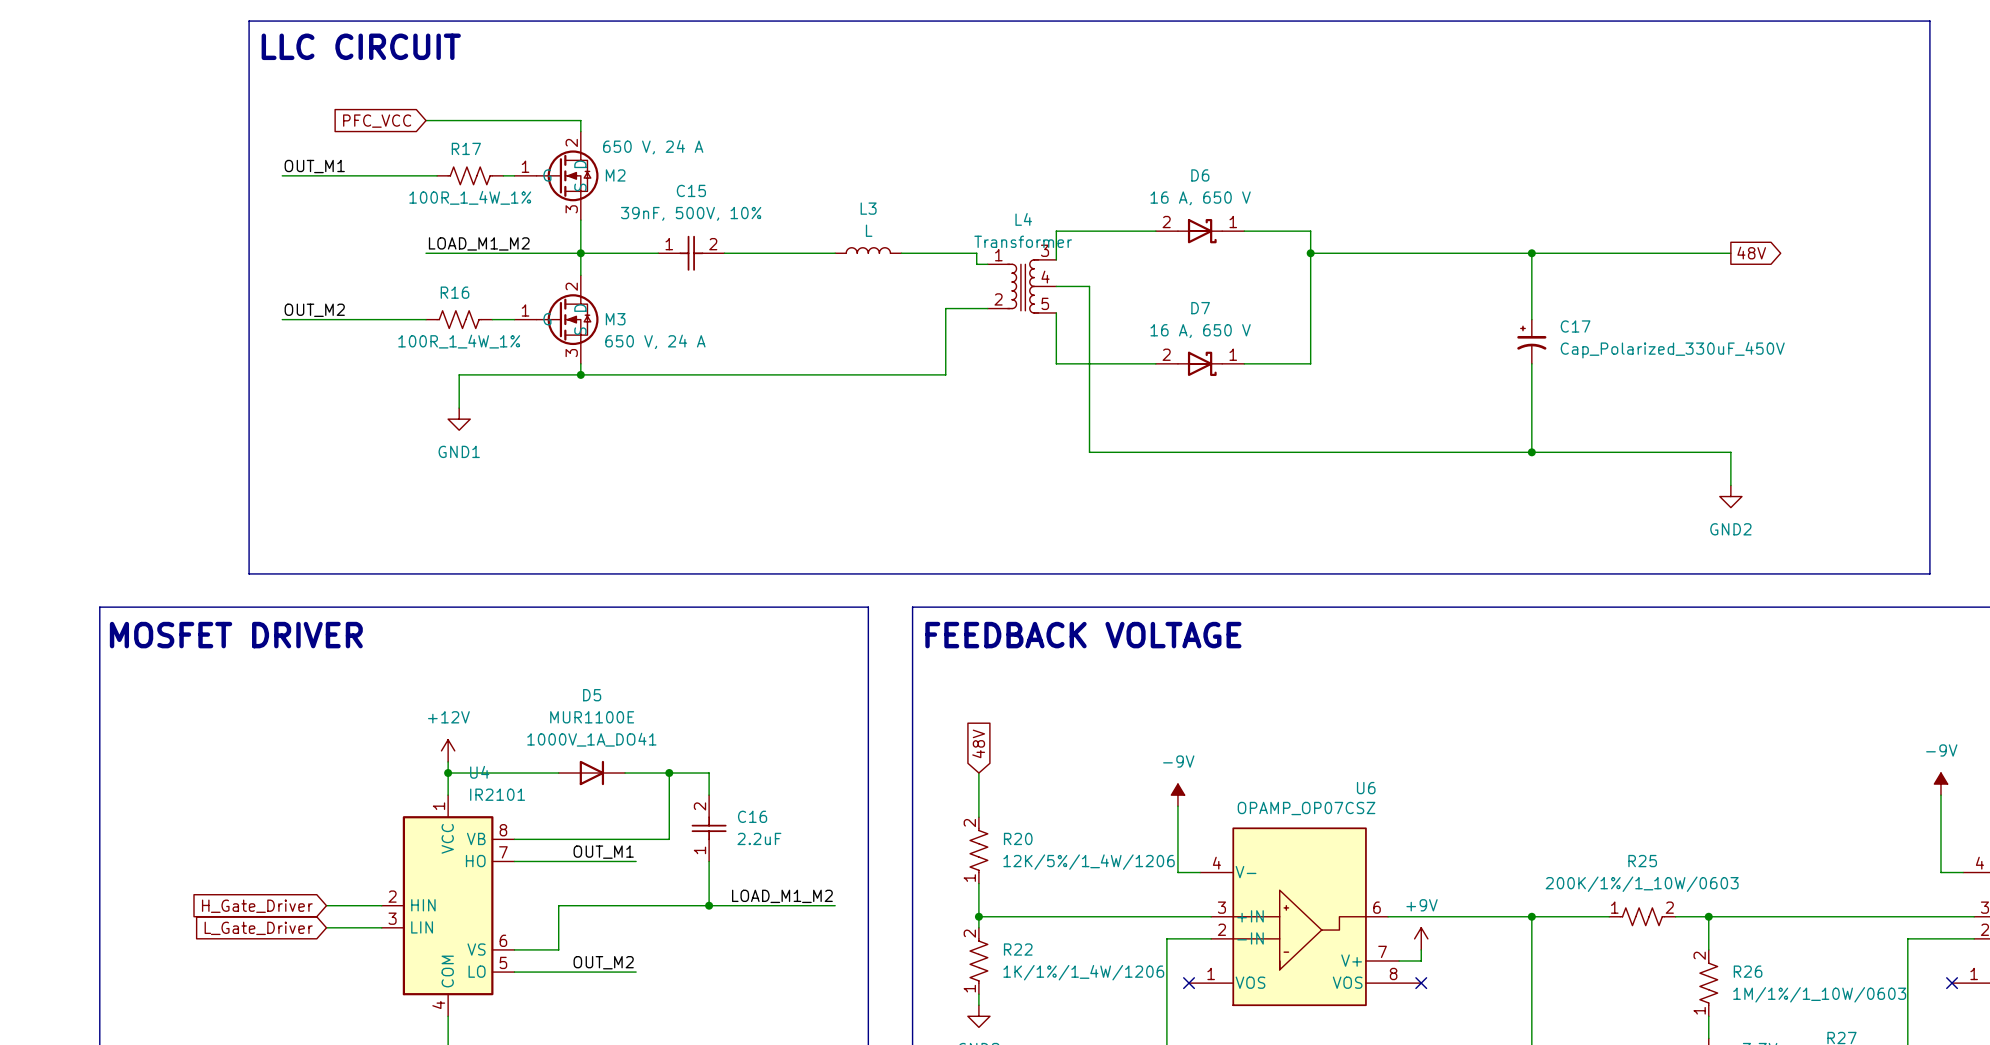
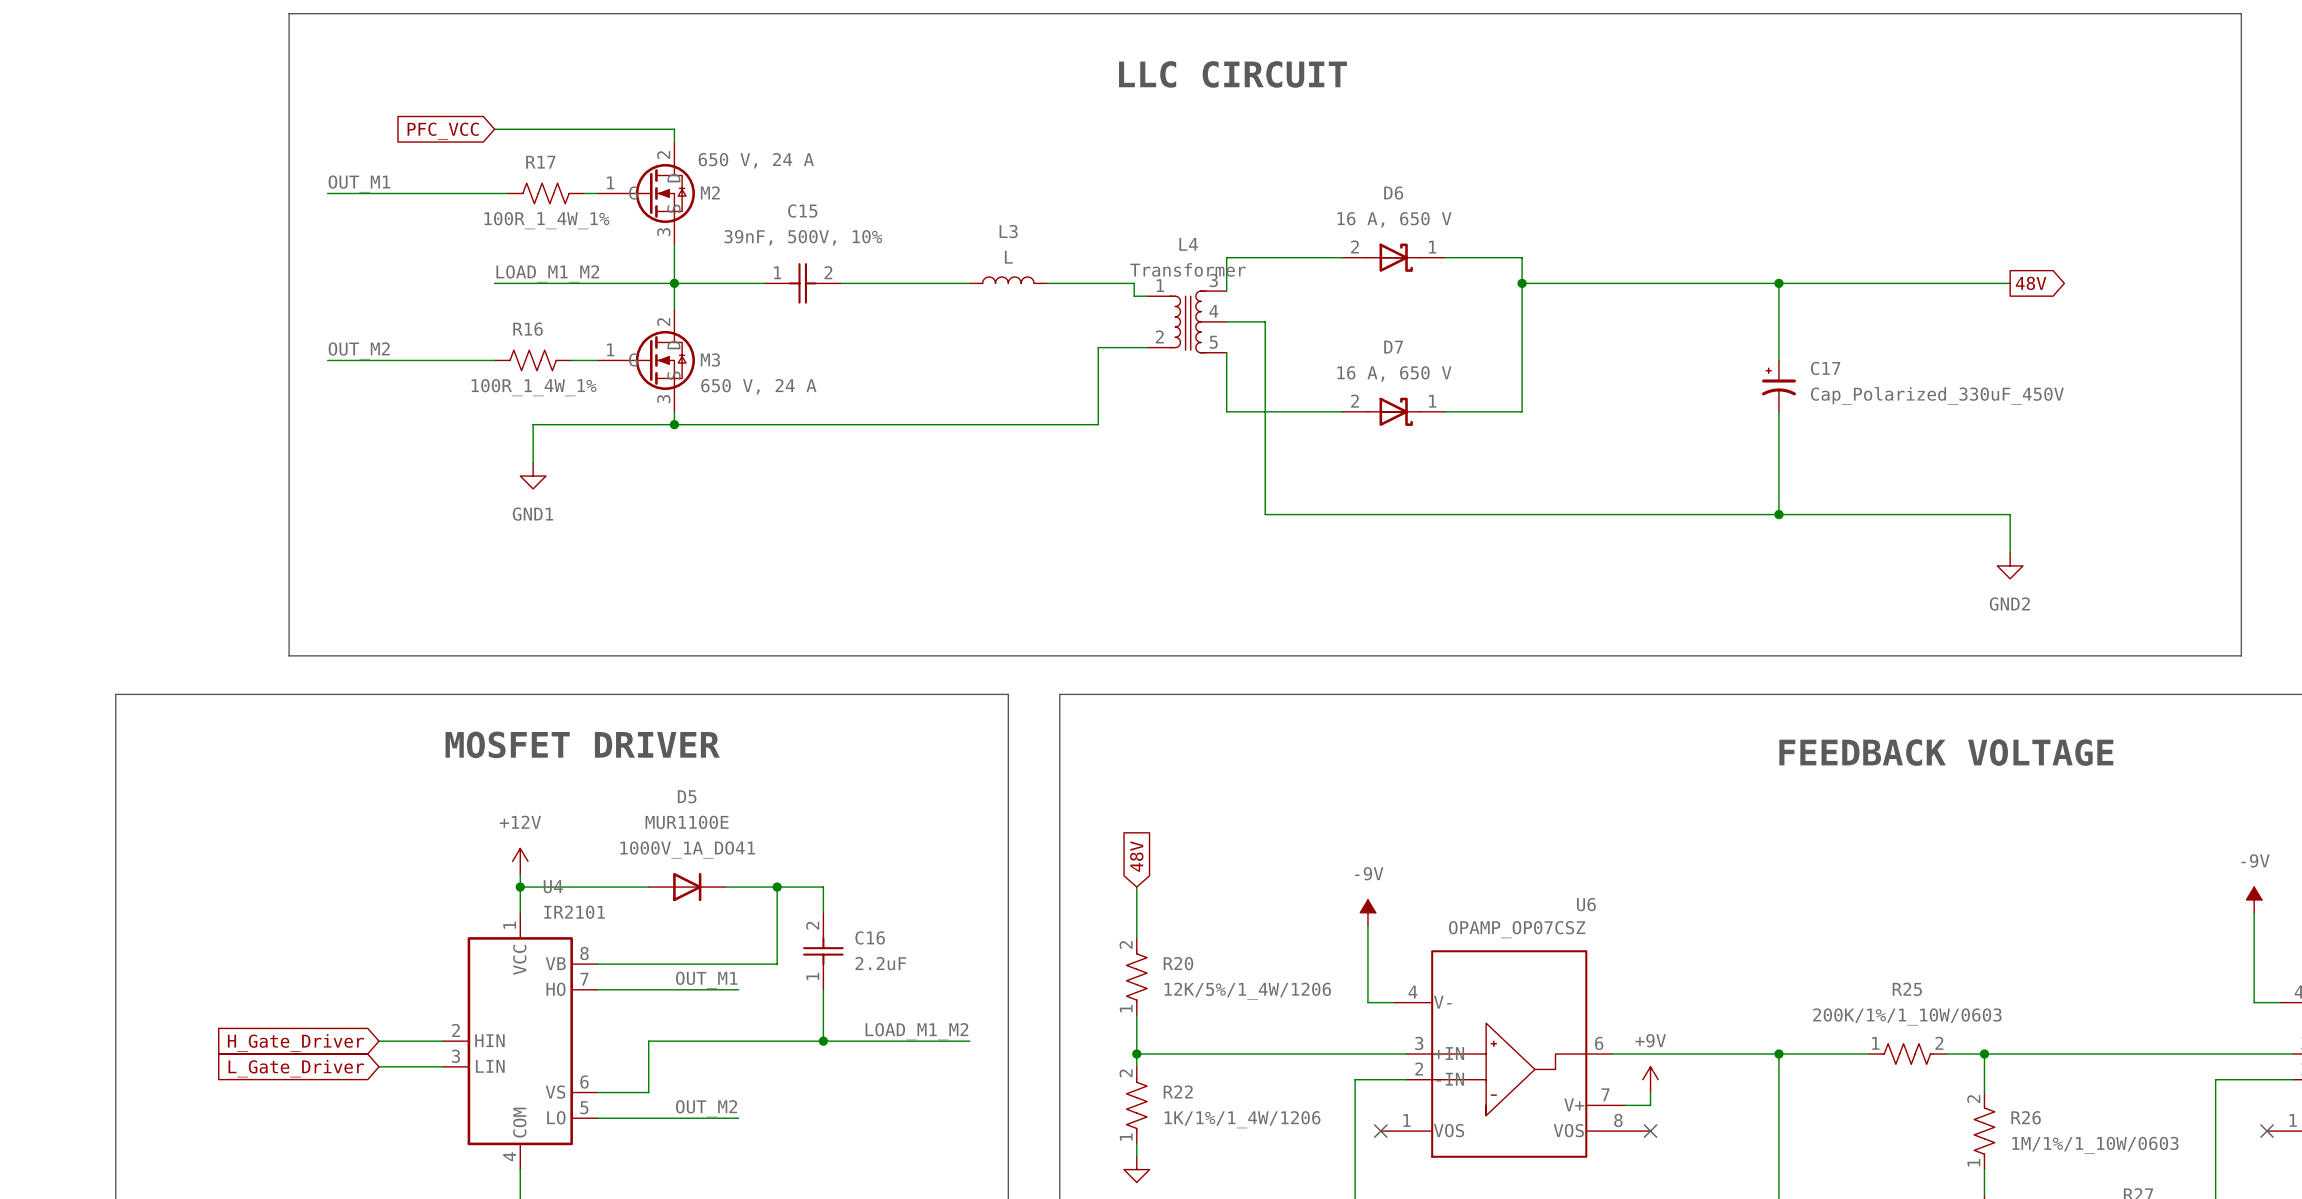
text: LLC CIRCUIT (361, 46) -> none
text: none -> LLC CIRCUIT (1232, 74)
text: MOSFET DRIVER (236, 635) -> none
text: FEEDBACK VOLTAGE (1083, 635) -> none
text: none -> MOSFET DRIVER (582, 744)
text: none -> FEEDBACK VOLTAGE (1946, 752)

